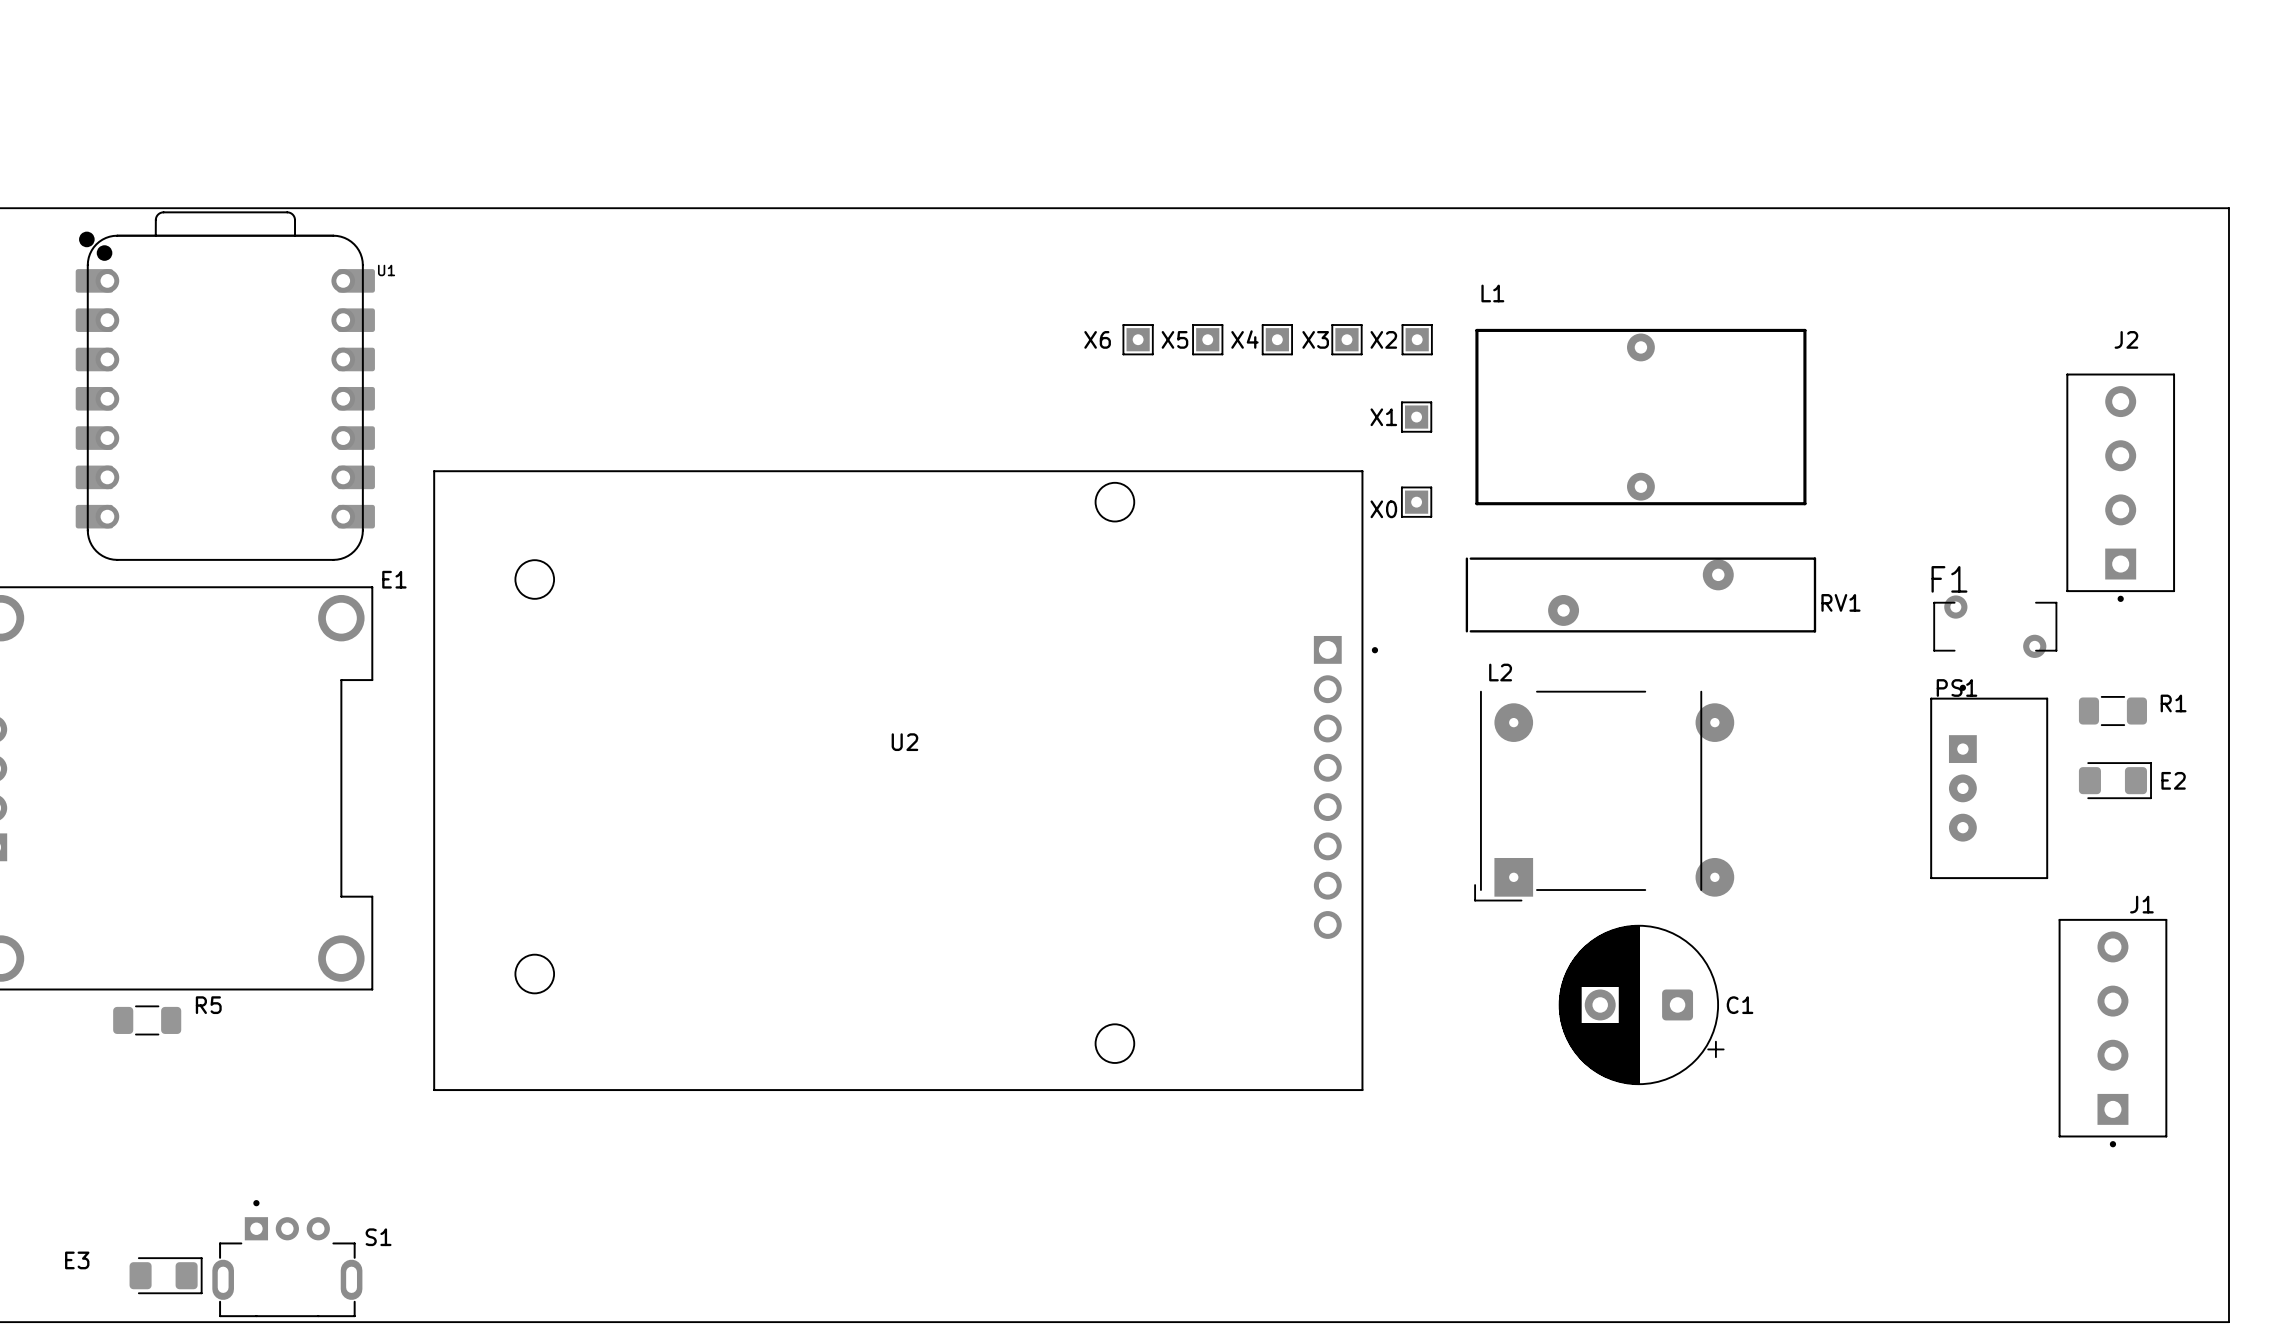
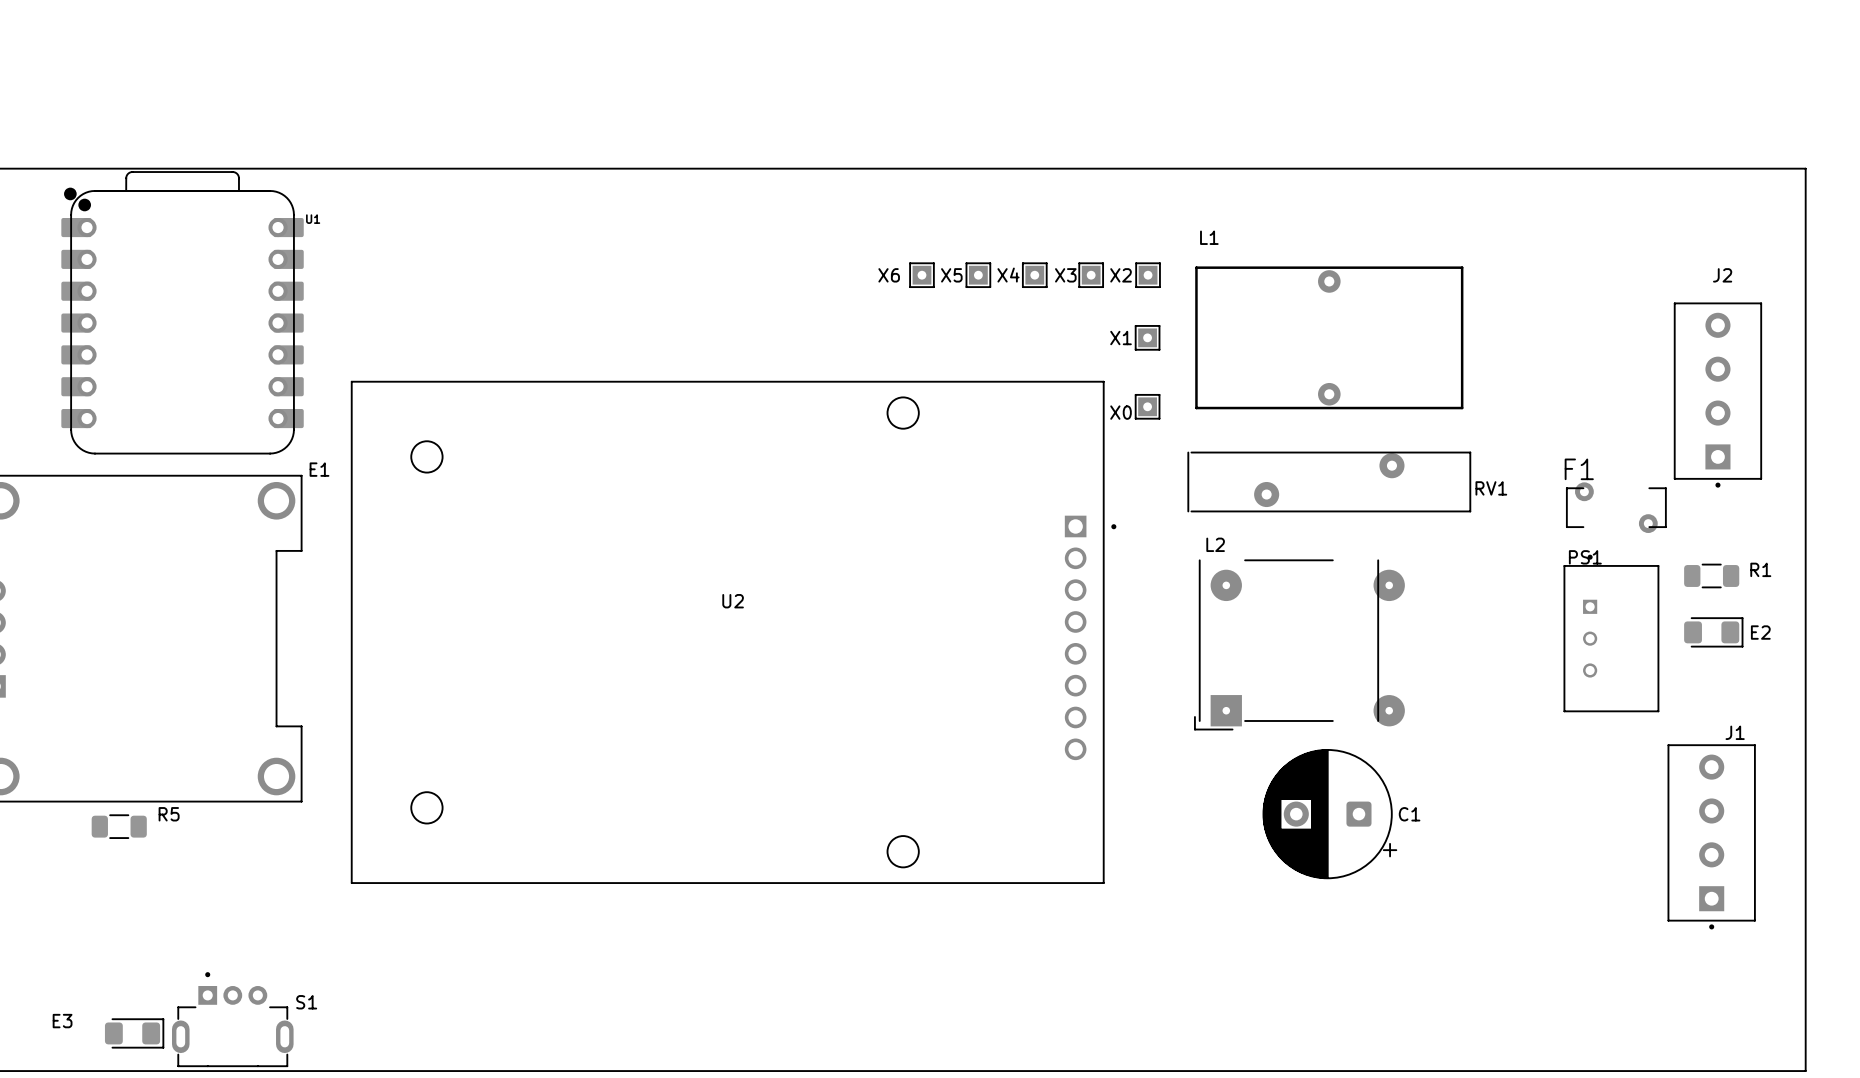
U2 footprint: [433, 470, 1379, 1092] -> [350, 380, 1117, 884]
PS1 footprint: [1930, 684, 2049, 880] -> [1563, 554, 1660, 713]

